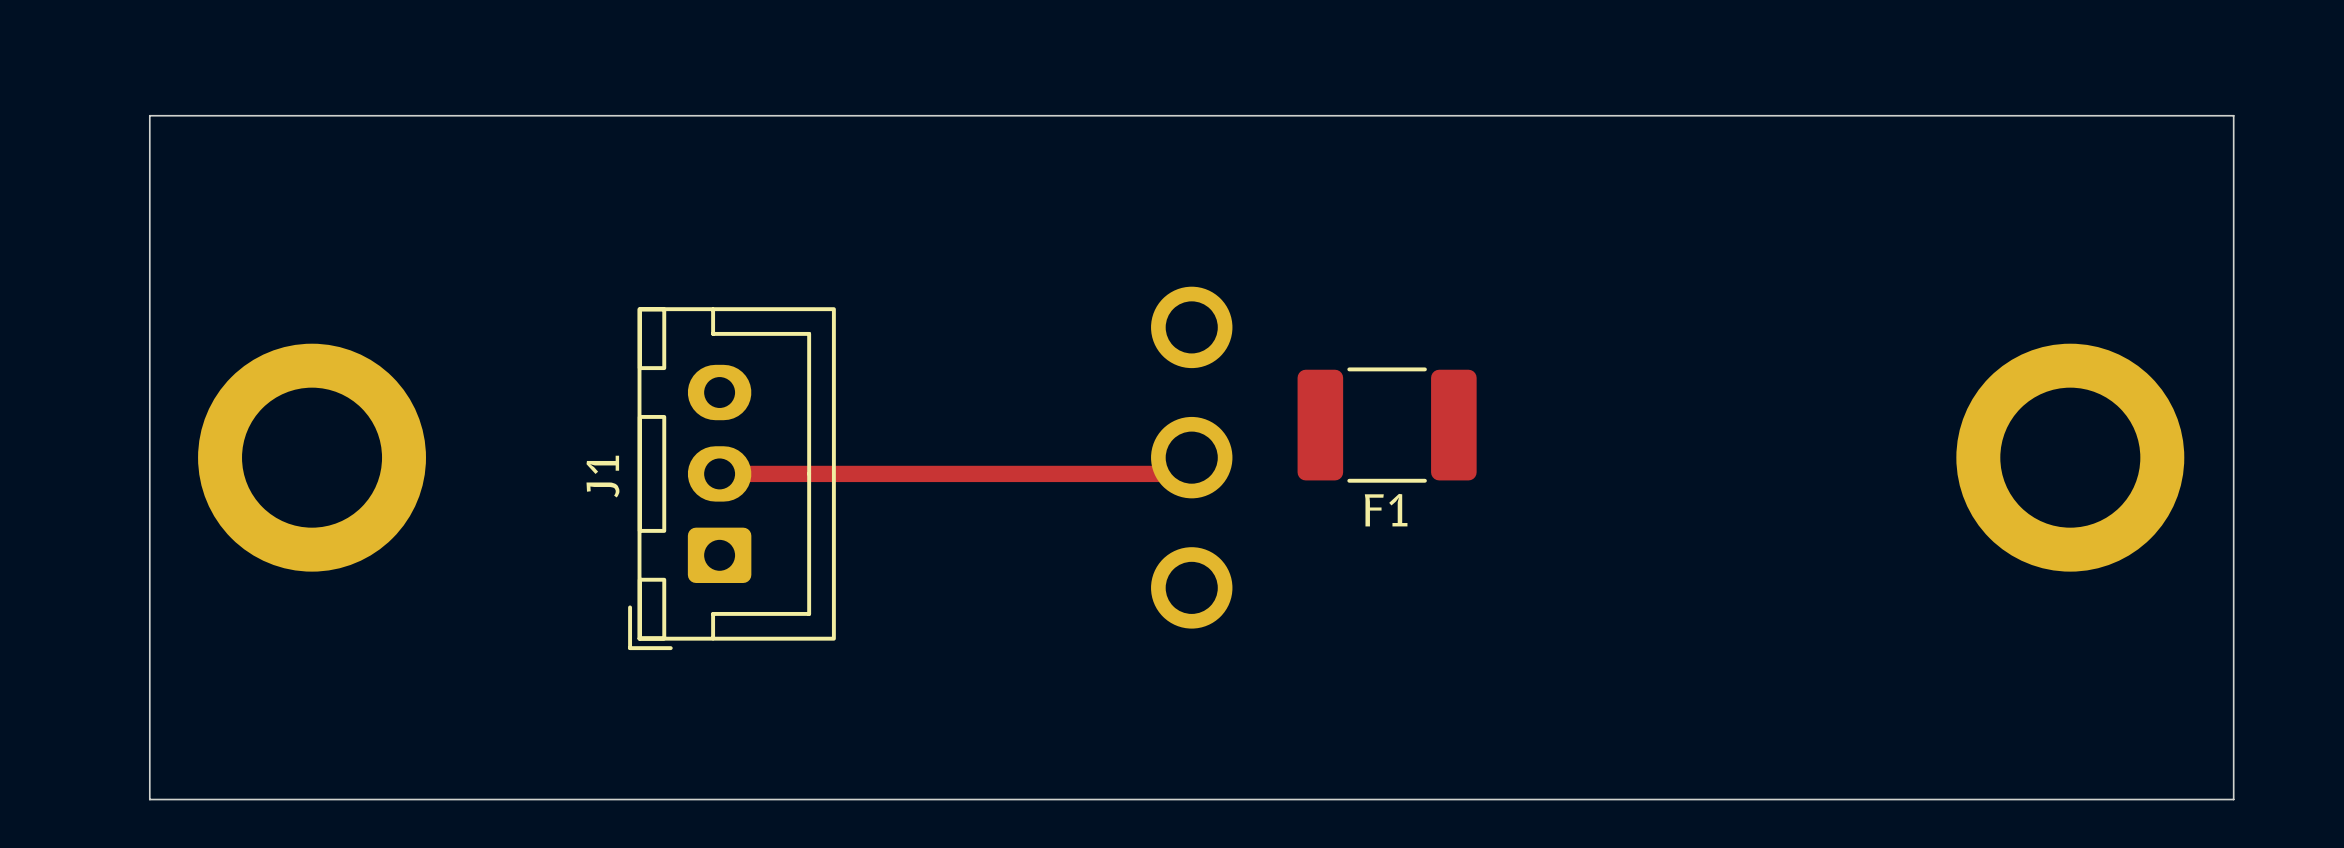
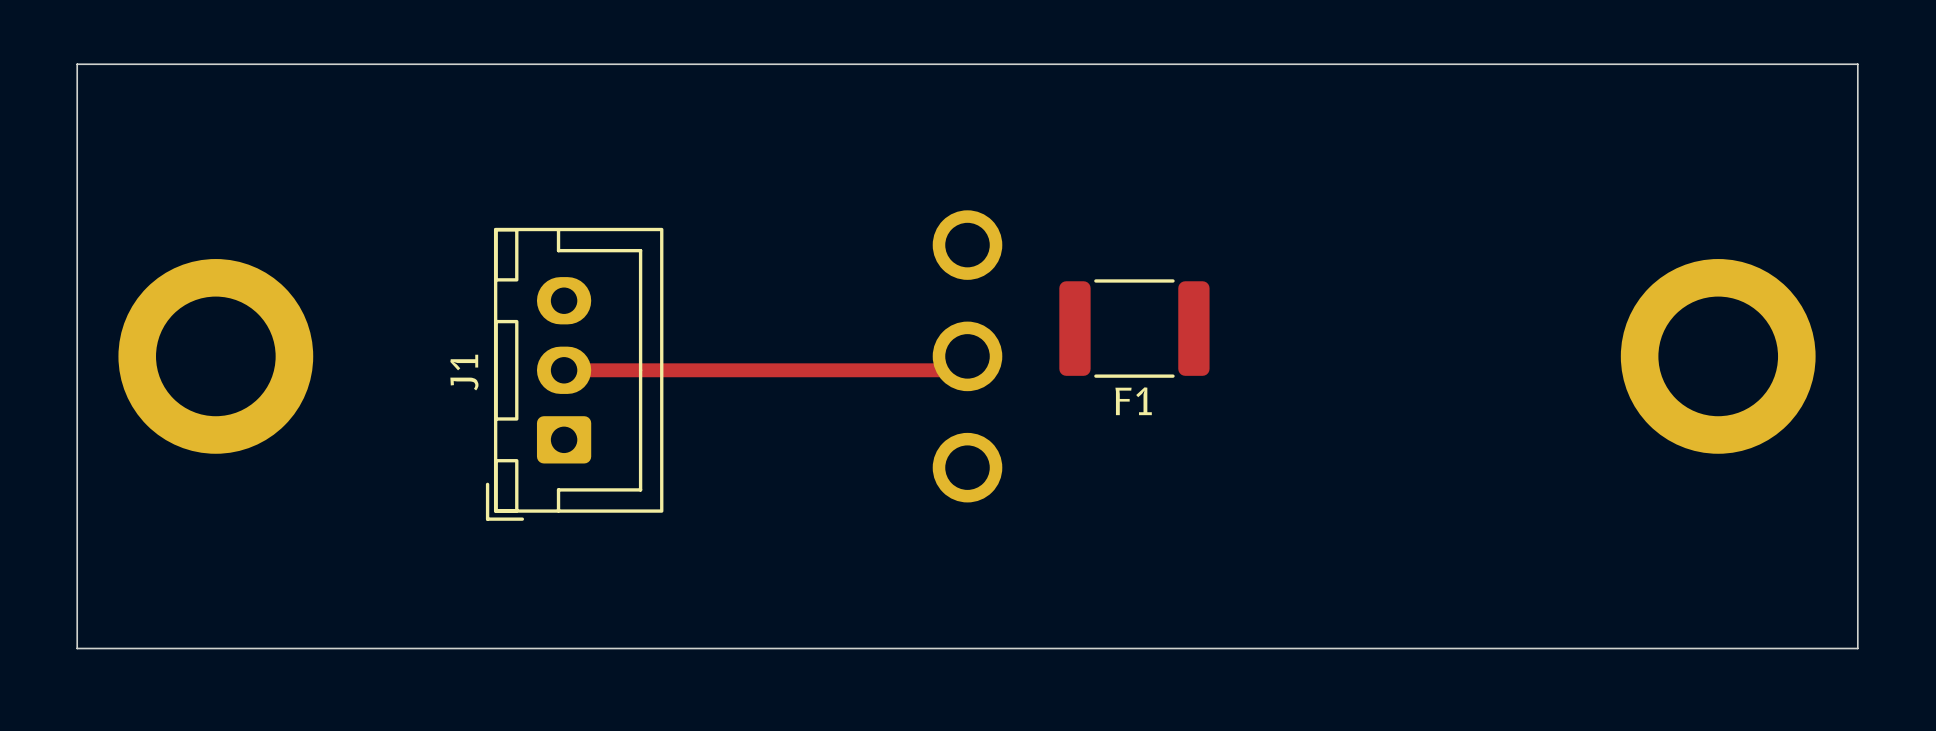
F1 footprint: [1297, 367, 1477, 483] -> [1059, 279, 1210, 378]

